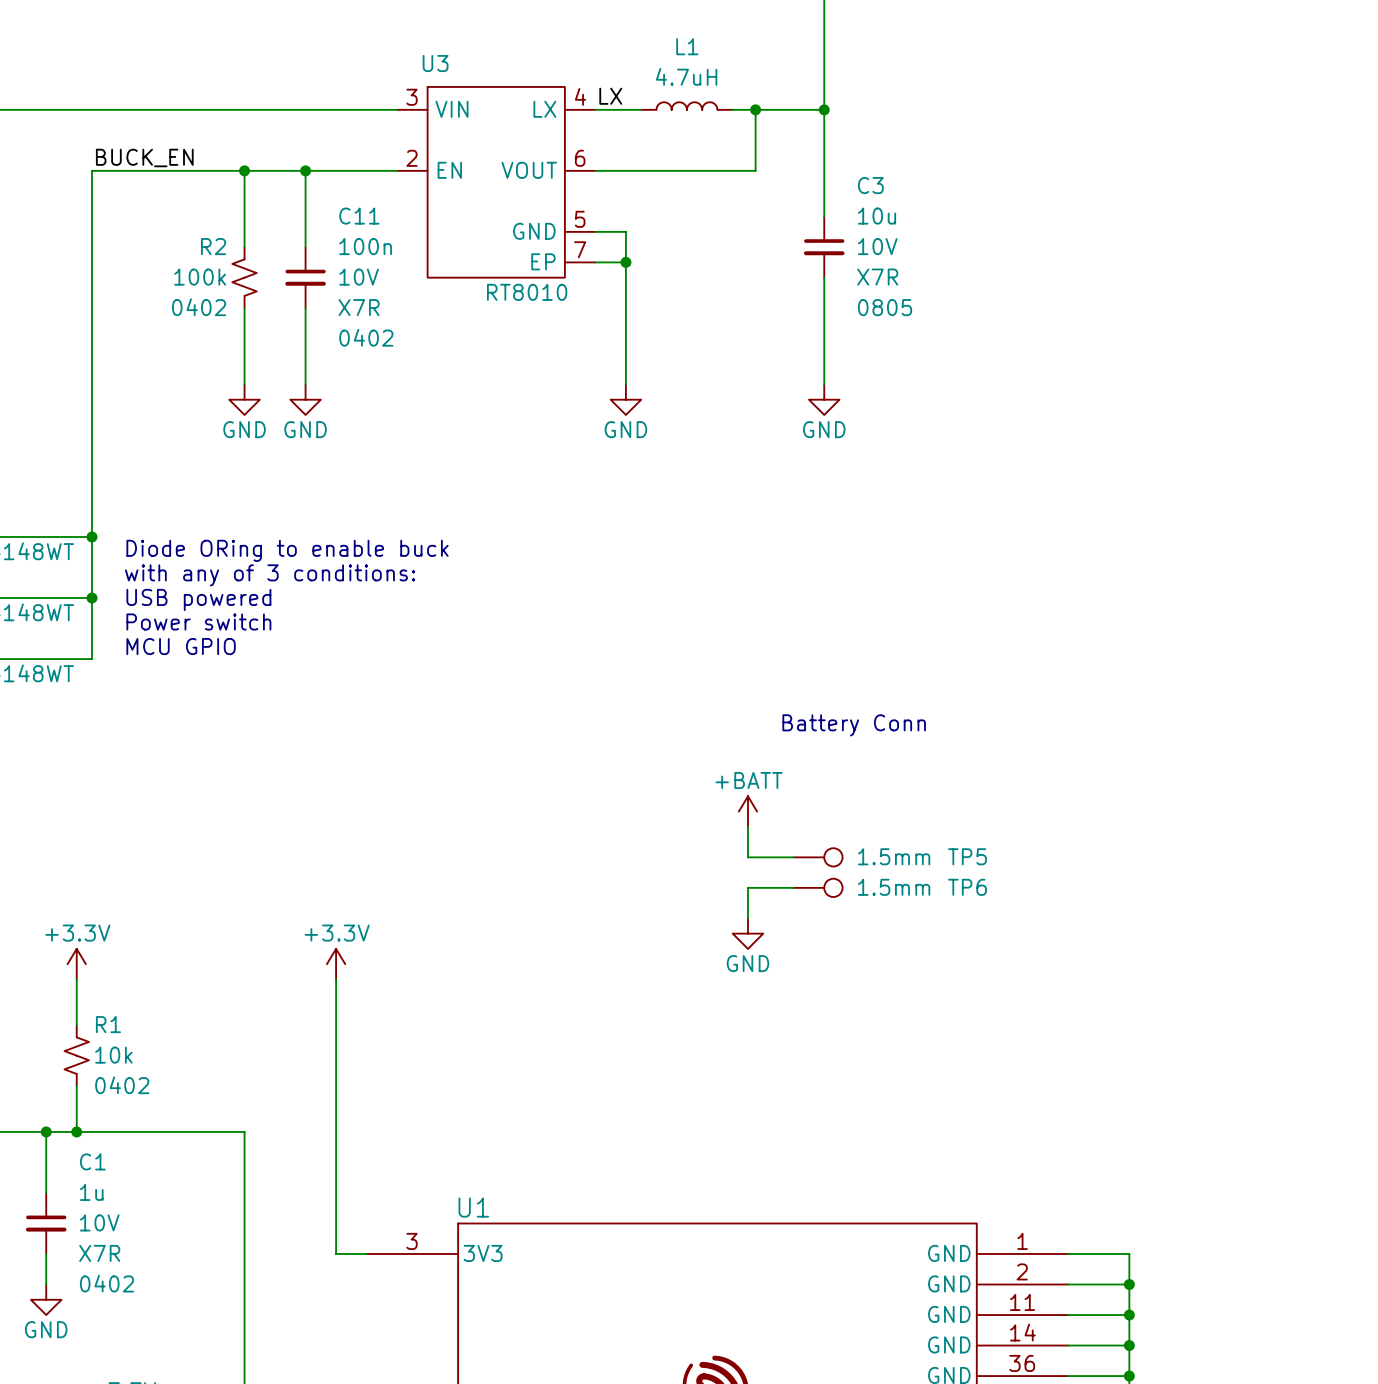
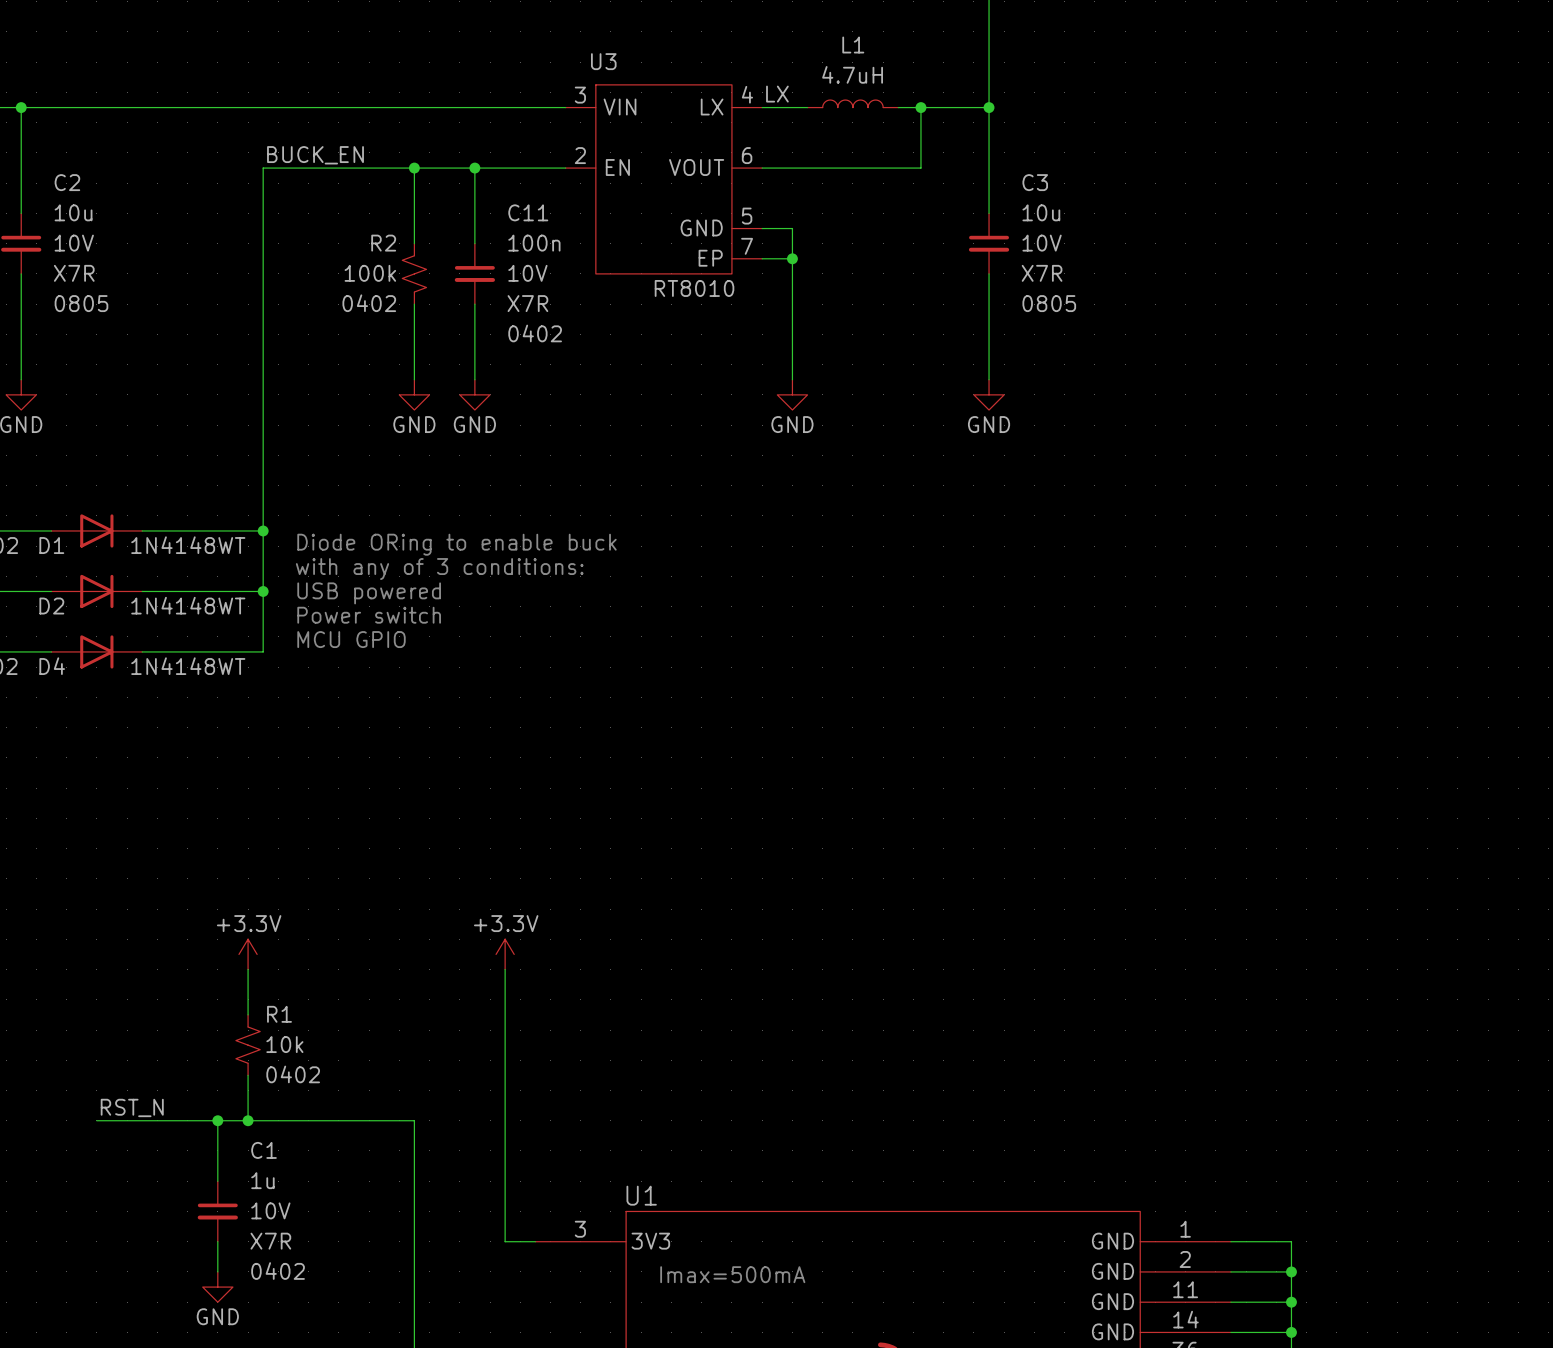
text: Battery Conn (854, 725) -> none
power symbol: +BATT (747, 811) -> none
wire: (747, 826) (747, 857) (793, 857) -> none
TP5: 1.5mm (818, 857) -> none
wire: (793, 887) (747, 887) (747, 918) -> none
TP6: 1.5mm (818, 887) -> none
power symbol: GND (747, 933) -> none
text: none -> Imax=500mA (732, 1274)

